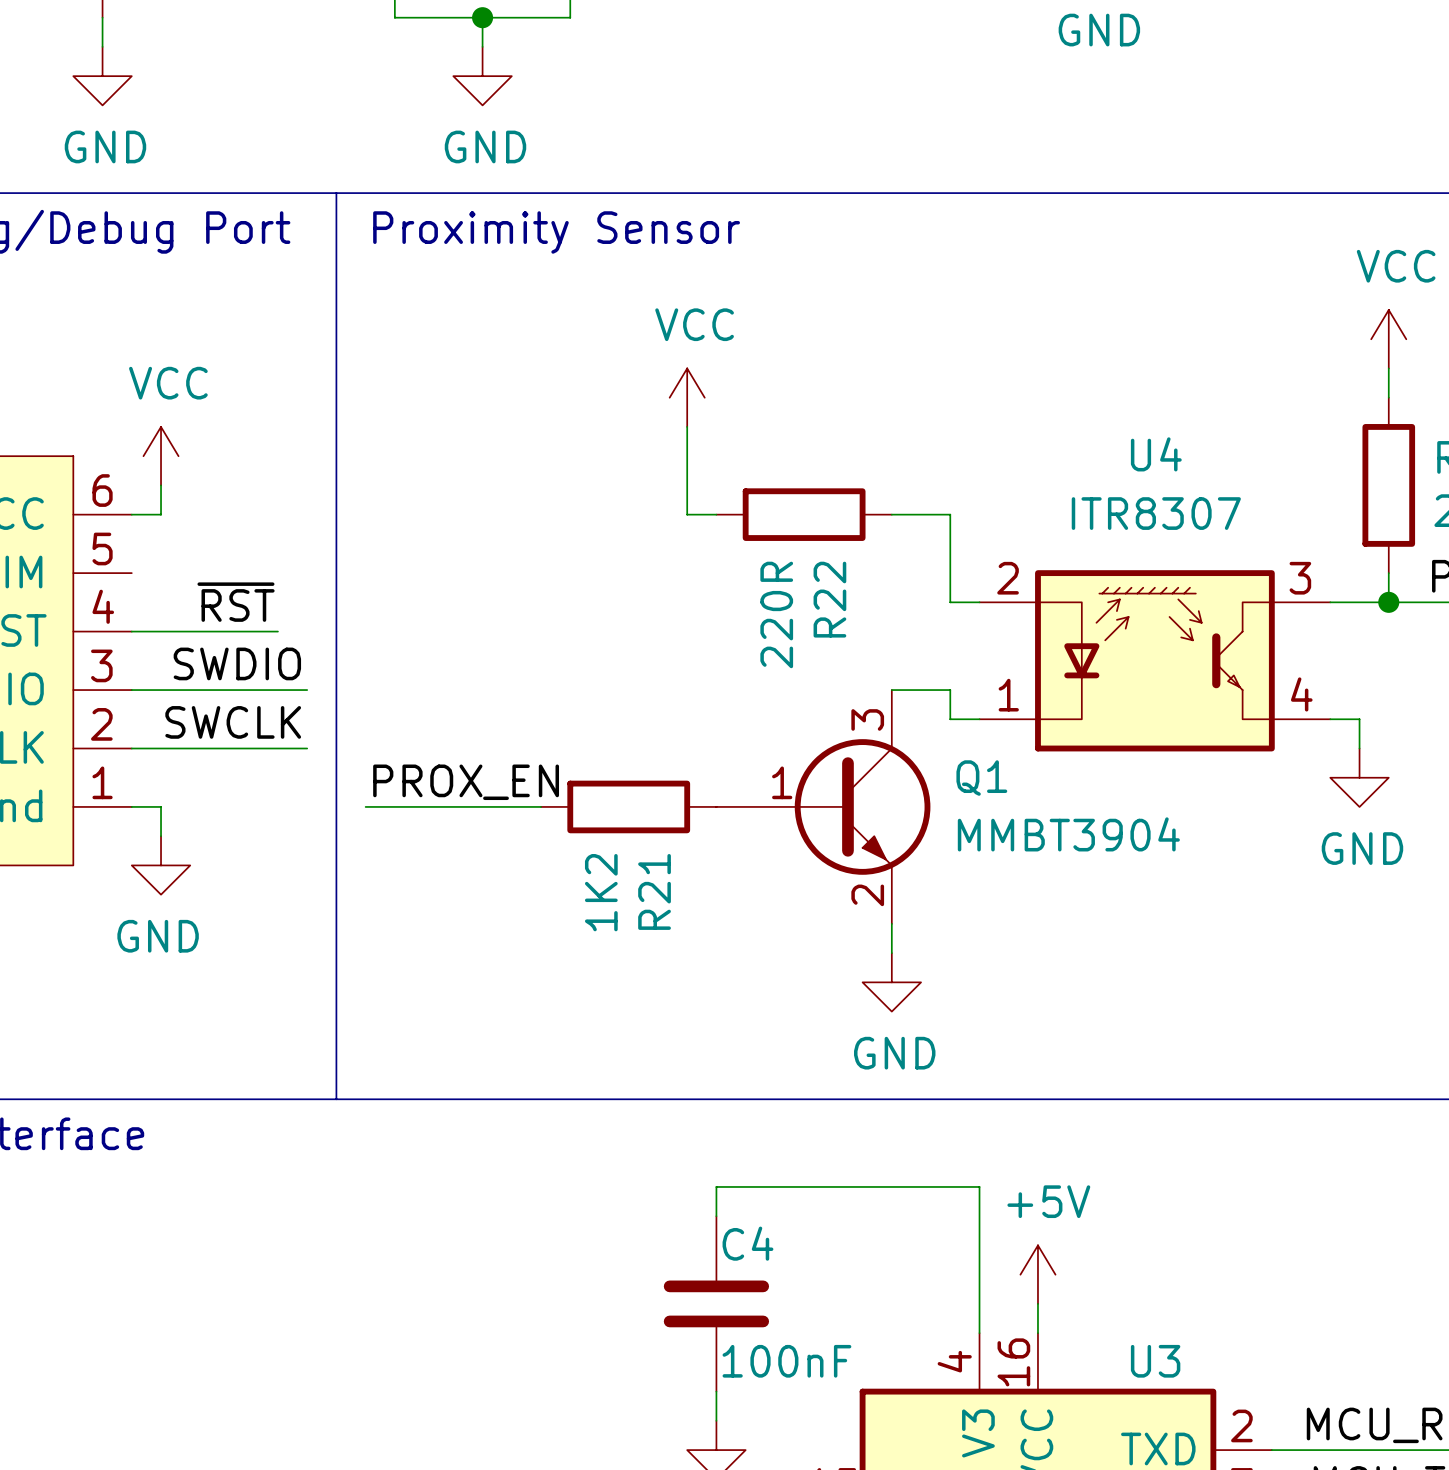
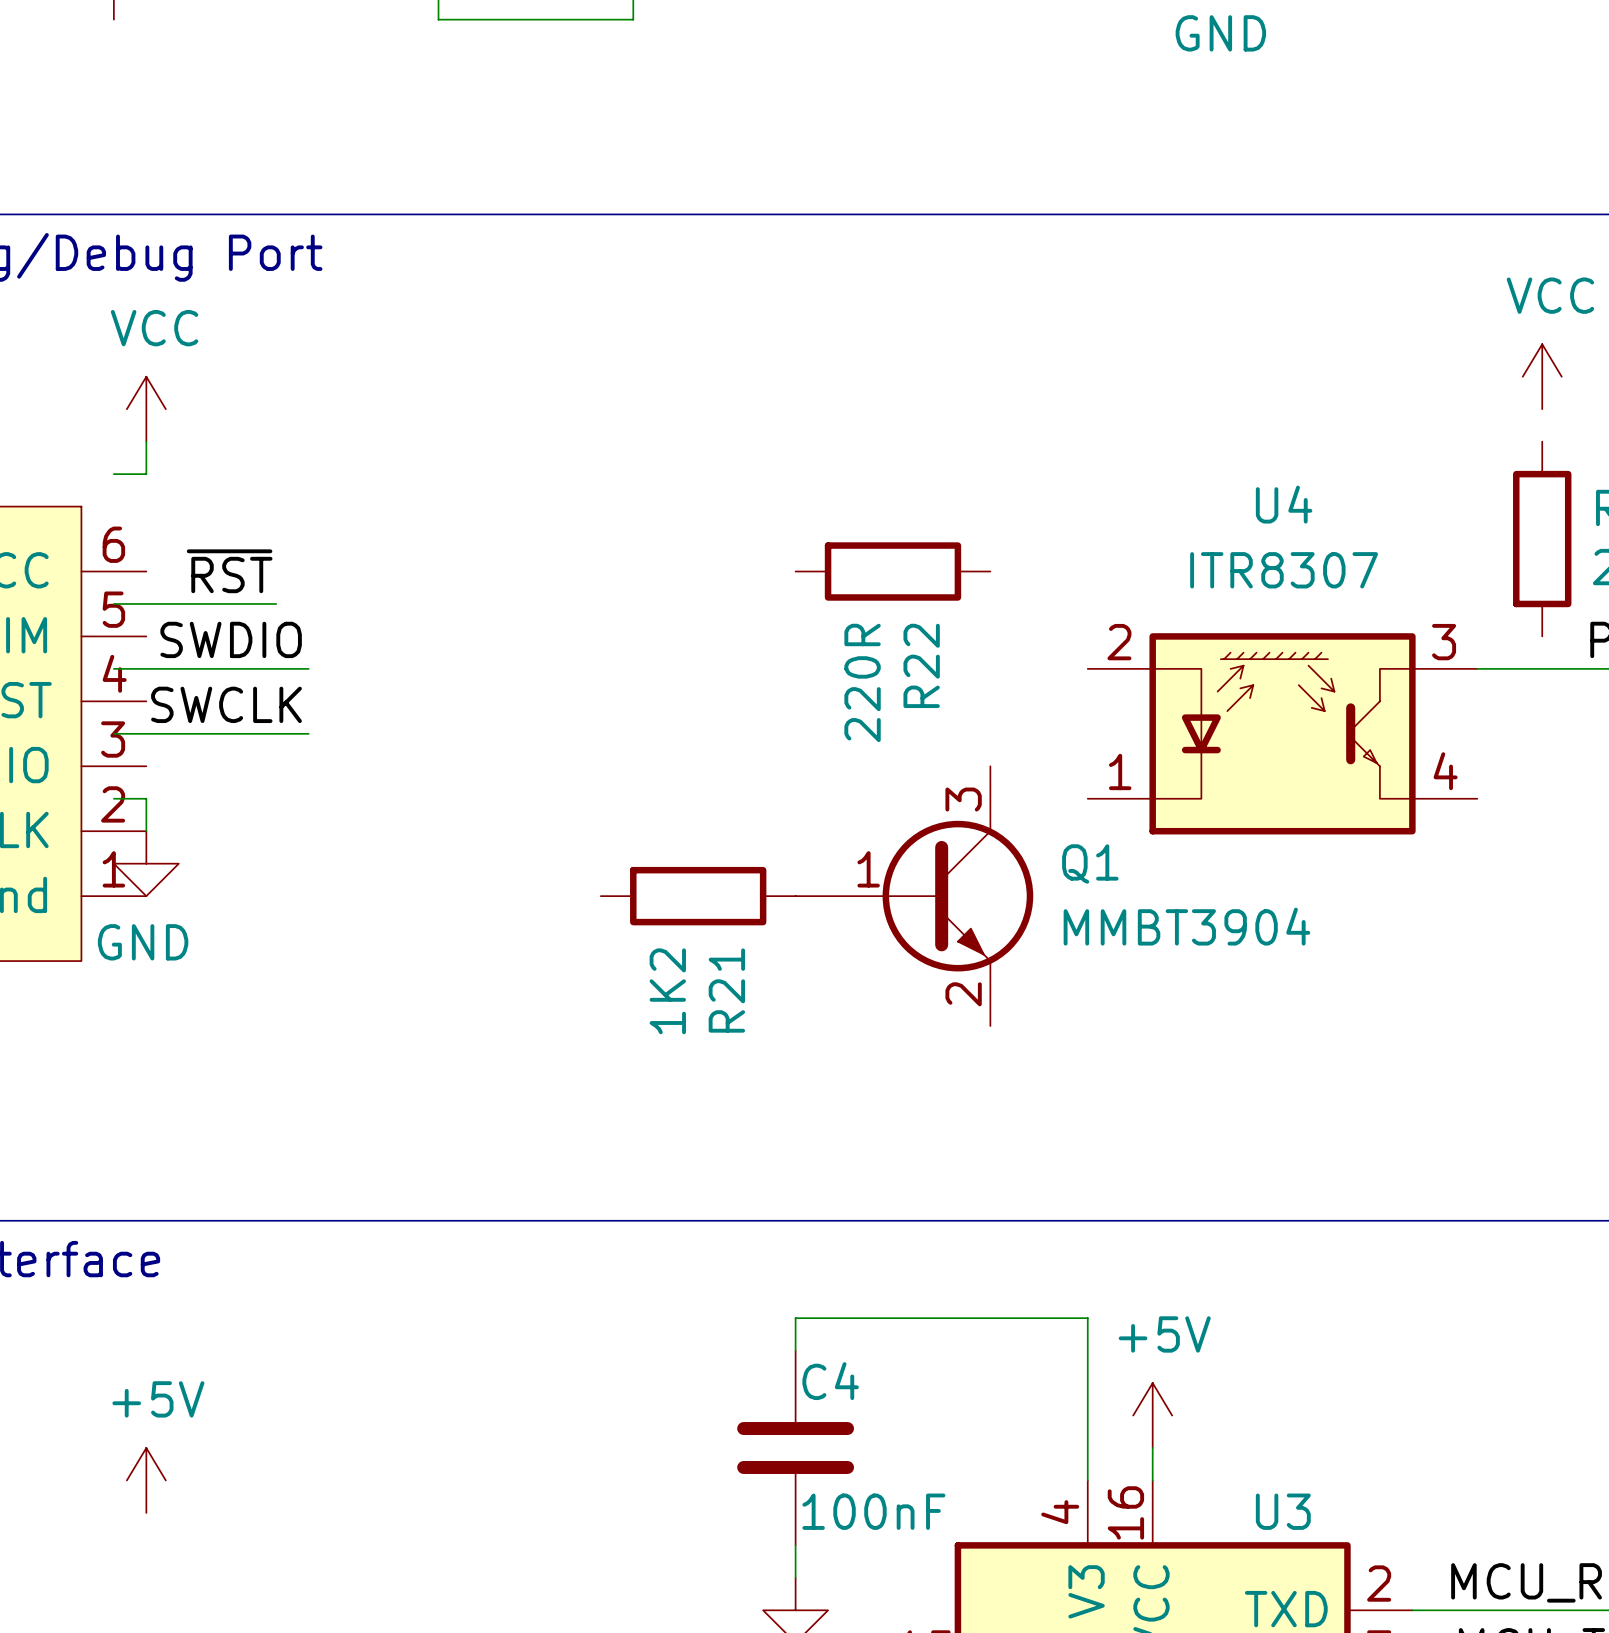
wire: (102, 17) (102, 46) -> none
wire: (482, 17) (482, 46) -> none
junction: (482, 17) -> none
power symbol: GND (102, 76) -> none
power symbol: GND (482, 76) -> none
line: (336, 193) (336, 1099) -> none
text: Proximity Sensor (556, 232) -> none
wire: (1388, 368) (1388, 397) -> none
power symbol: VCC (687, 397) -> none
wire: (687, 426) (687, 514) (716, 514) -> none
power symbol position: VCC (161, 456) -> VCC (146, 409)
wire: (161, 485) (161, 514) (131, 514) -> (146, 441) (146, 474) (113, 474)
wire: (891, 514) (950, 514) (950, 602) (979, 602) -> none
wire: (1388, 573) (1388, 602) -> none
label position: ~{RST} (236, 602) -> ~{RST} (229, 571)
junction: (1388, 602) -> none
wire: (131, 631) (277, 631) -> (113, 603) (276, 603)
label position: SWDIO (237, 663) -> SWDIO (231, 639)
wire: (131, 690) (307, 690) -> (113, 668) (308, 668)
wire: (891, 690) (950, 690) (950, 719) (979, 719) -> none
wire: (1330, 719) (1359, 719) (1359, 748) -> none
label position: SWCLK (233, 722) -> SWCLK (226, 704)
wire: (131, 748) (307, 748) -> (146, 831) (146, 798) (113, 798)
power symbol: GND (1359, 777) -> none
label: PROX_EN (466, 782) -> none
wire: (131, 806) (161, 806) (161, 836) -> none
wire: (365, 806) (541, 806) -> (113, 733) (308, 733)
power symbol position: GND (161, 865) -> GND (146, 863)
wire: (891, 923) (891, 953) -> none
power symbol: GND (891, 982) -> none
power symbol: none -> +5V (146, 1480)

